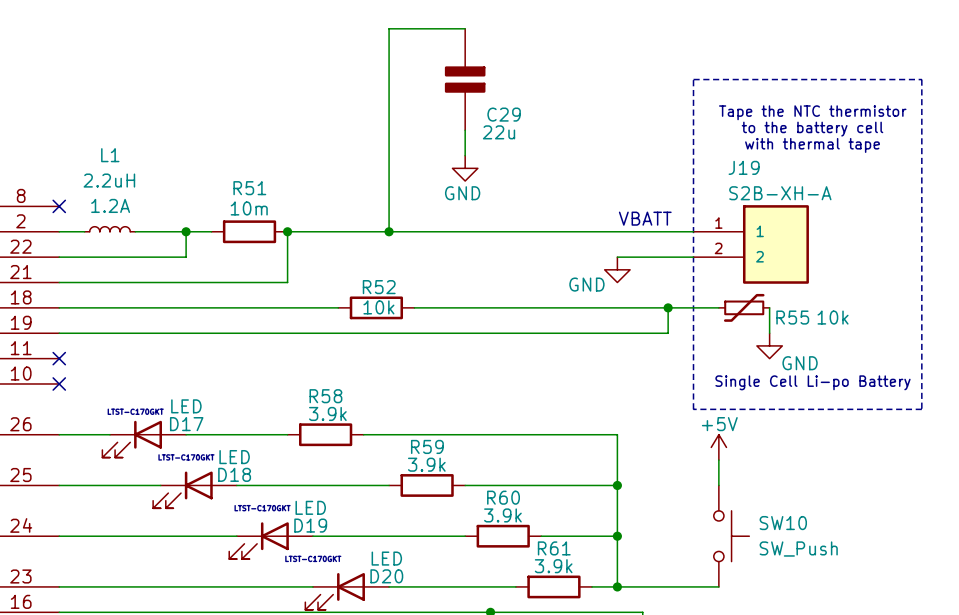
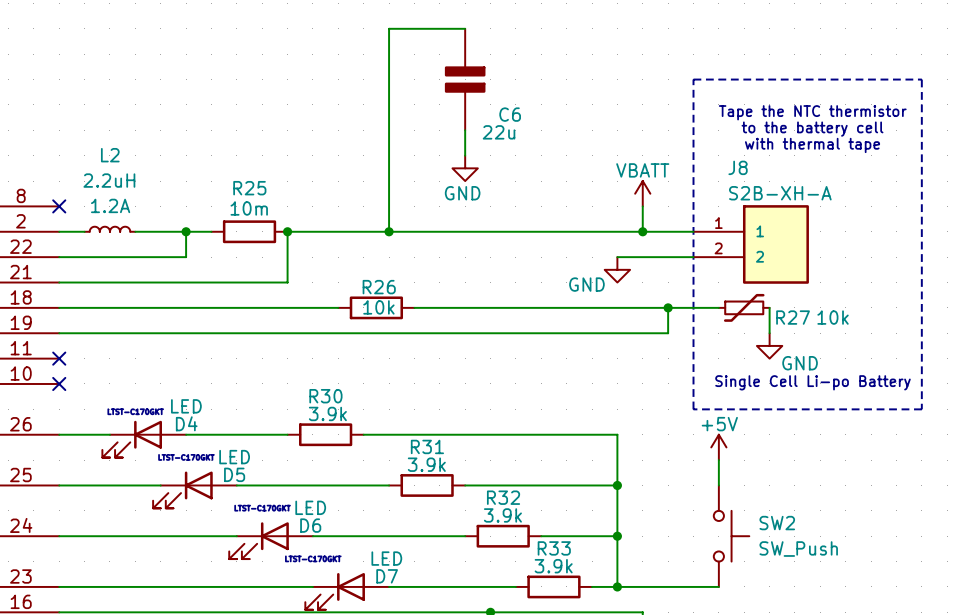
C29 name: C29 (504, 114) -> C6 (510, 114)
L1 name: L1 (110, 155) -> L2 (110, 155)
J19 name: J19 (744, 167) -> J8 (738, 167)
R51 name: R51 (249, 188) -> R25 (249, 188)
power symbol: none -> VBATT (642, 193)
wire: none -> (642, 206) (642, 231)
text: VBATT (645, 218) -> none
junction: none -> (642, 231)
R52 name: R52 (379, 287) -> R26 (379, 287)
R55 name: R55 (792, 317) -> R27 (793, 317)
R58 name: R58 (325, 396) -> R30 (325, 396)
D17 name: D17 (186, 424) -> D4 (186, 423)
R59 name: R59 (427, 446) -> R31 (427, 446)
D18 name: D18 (234, 474) -> D5 (234, 474)
R60 name: R60 (503, 497) -> R32 (503, 497)
SW10 name: SW10 (783, 523) -> SW2 (777, 523)
D19 name: D19 (310, 525) -> D6 (310, 525)
R61 name: R61 (554, 548) -> R33 (554, 548)
D20 name: D20 (386, 576) -> D7 (387, 576)

